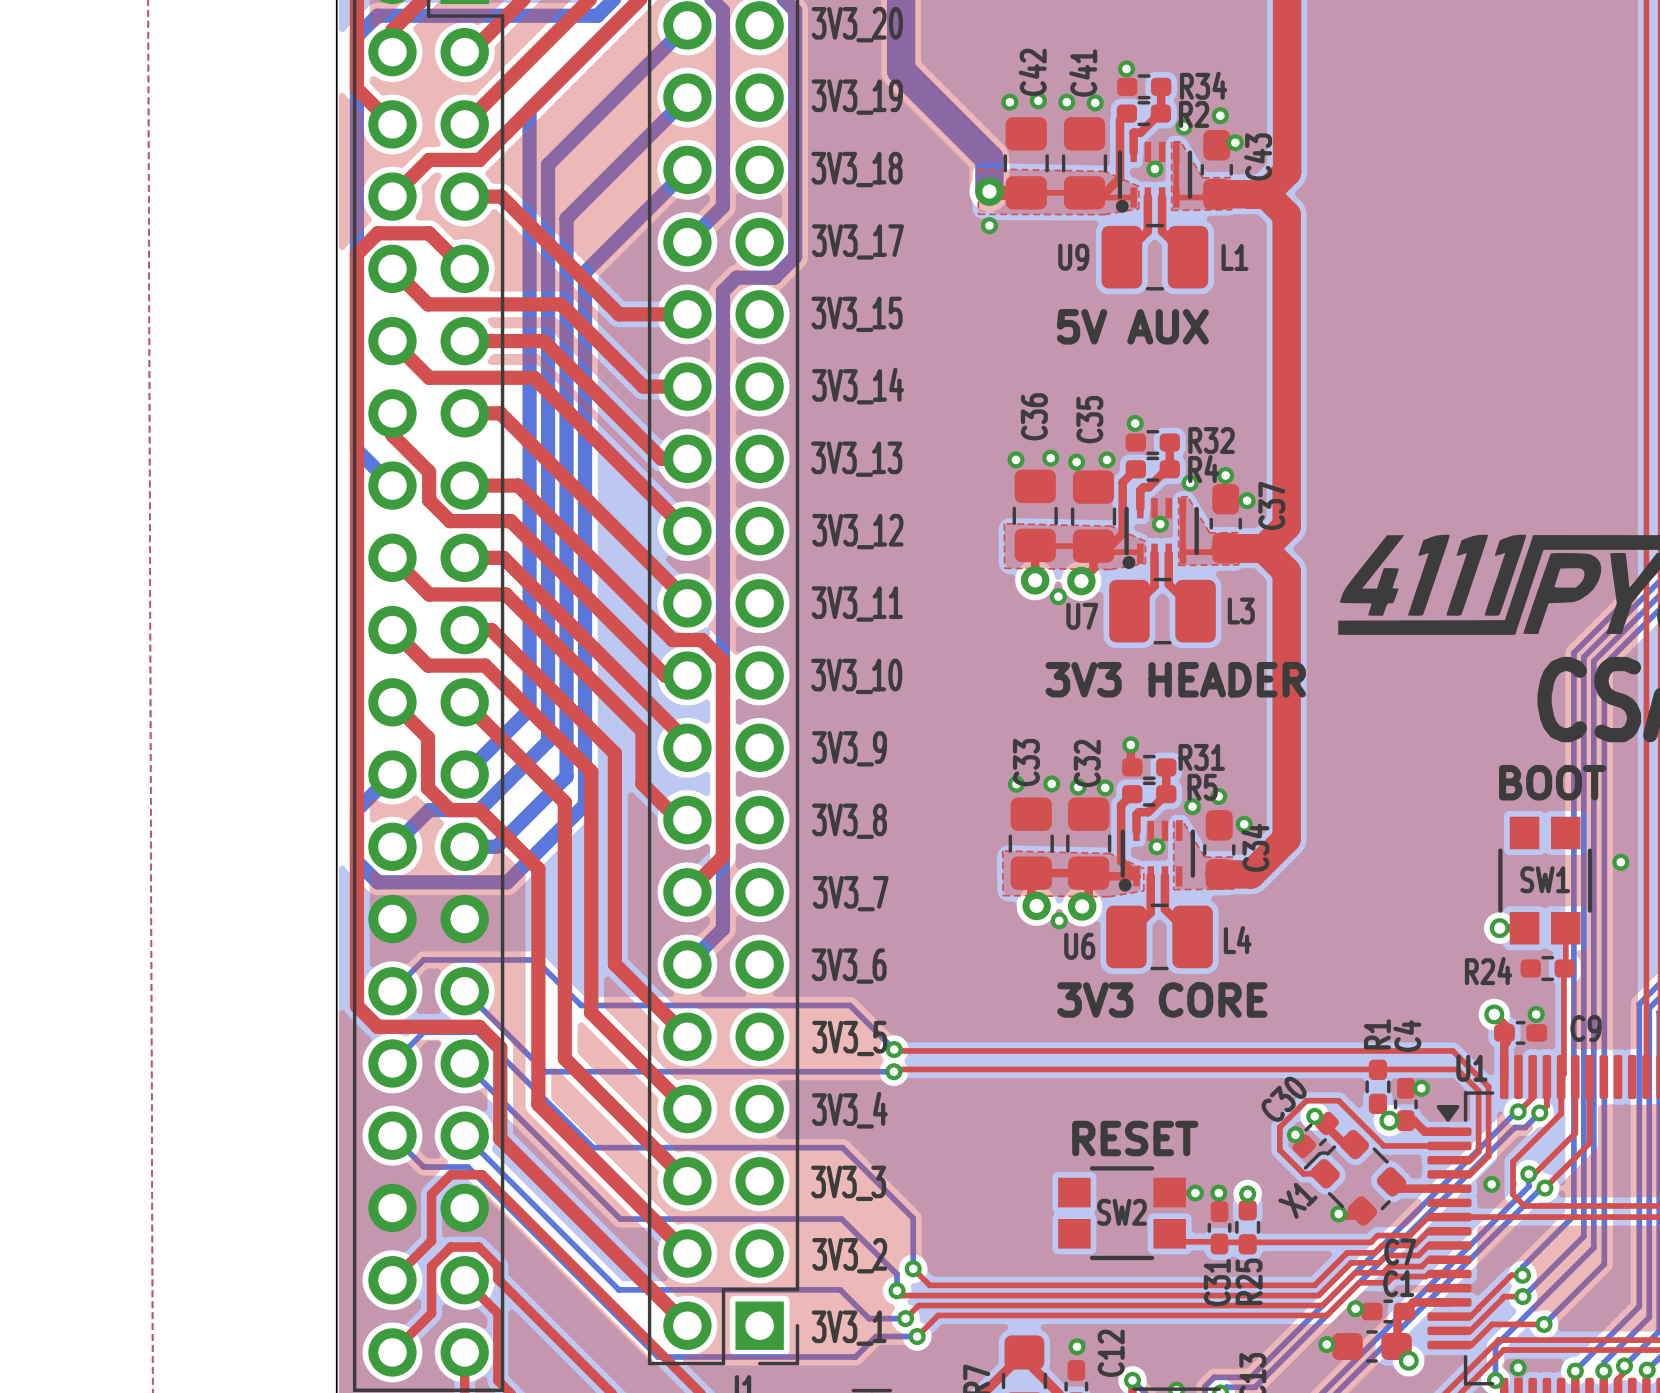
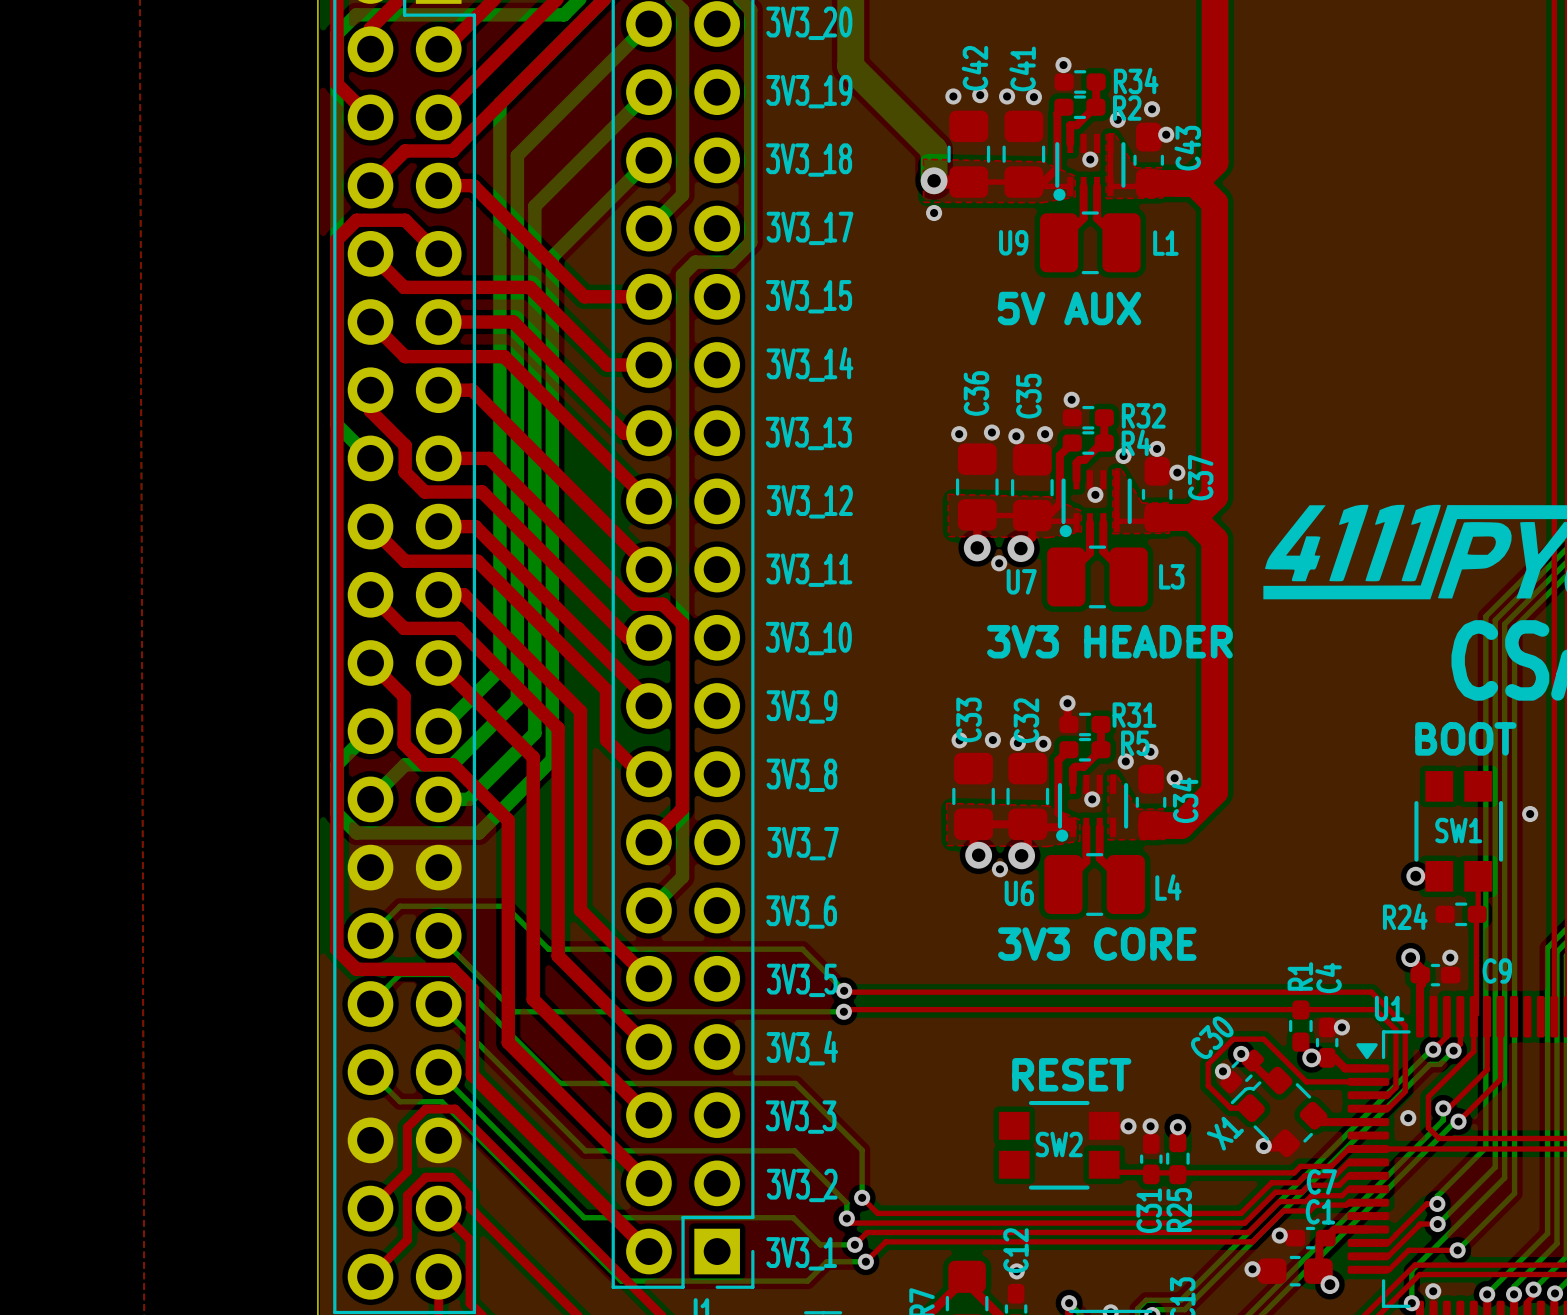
C12 name position: C12 (1111, 1353) -> C12 (1015, 1250)

